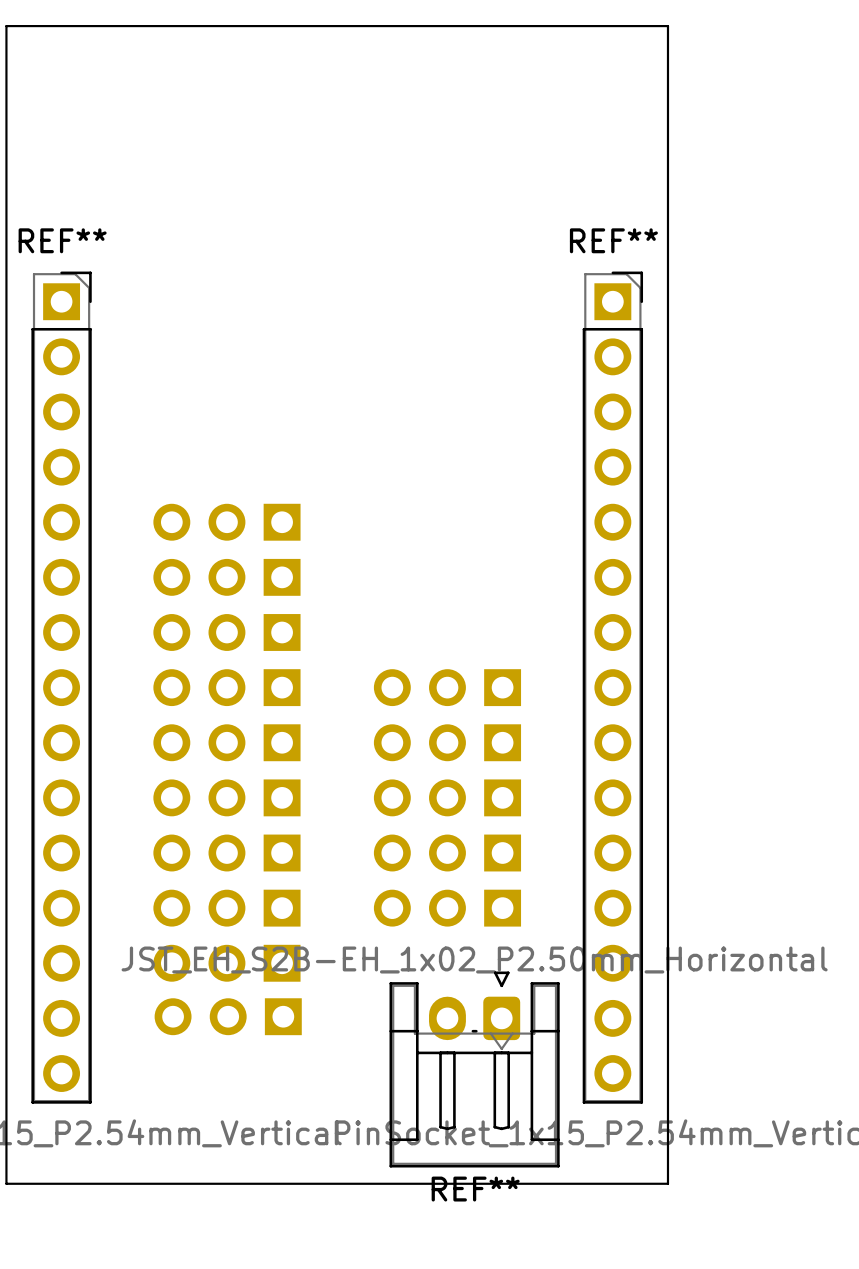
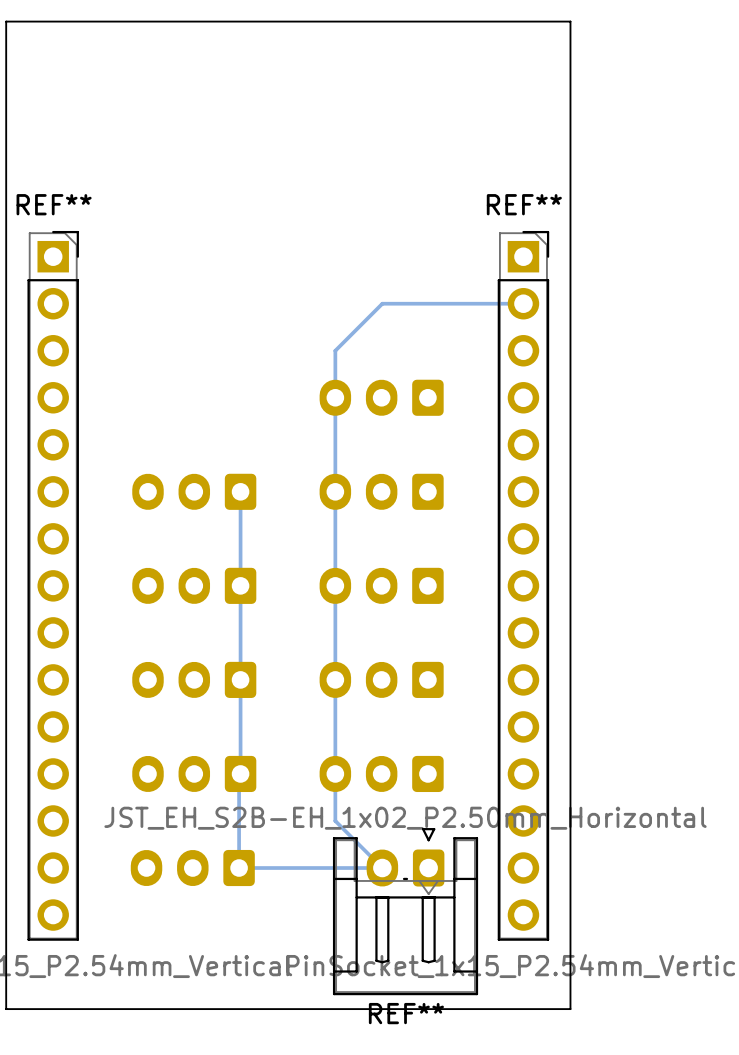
track: none -> (523, 303) (382, 303) (335, 350) (335, 820) (382, 868) (239, 868) (240, 491)
part: none -> (381, 397)
part: (226, 522) -> none
part footprint: [153, 558, 301, 596] -> [132, 473, 257, 510]
part: none -> (381, 491)
part: (226, 632) -> none
part footprint: [153, 669, 301, 707] -> [132, 567, 257, 604]
part footprint: [373, 669, 522, 707] -> [319, 567, 444, 604]
part: (226, 742) -> none
part: (447, 742) -> none
part footprint: [153, 779, 301, 817] -> [132, 661, 257, 698]
part footprint: [373, 779, 522, 817] -> [319, 661, 444, 698]
part: (226, 853) -> none
part: (447, 853) -> none
part footprint: [153, 889, 301, 927] -> [132, 755, 257, 793]
part footprint: [373, 889, 522, 927] -> [319, 755, 444, 793]
part: (226, 963) -> none
part footprint: [154, 998, 302, 1036] -> [130, 849, 255, 887]

